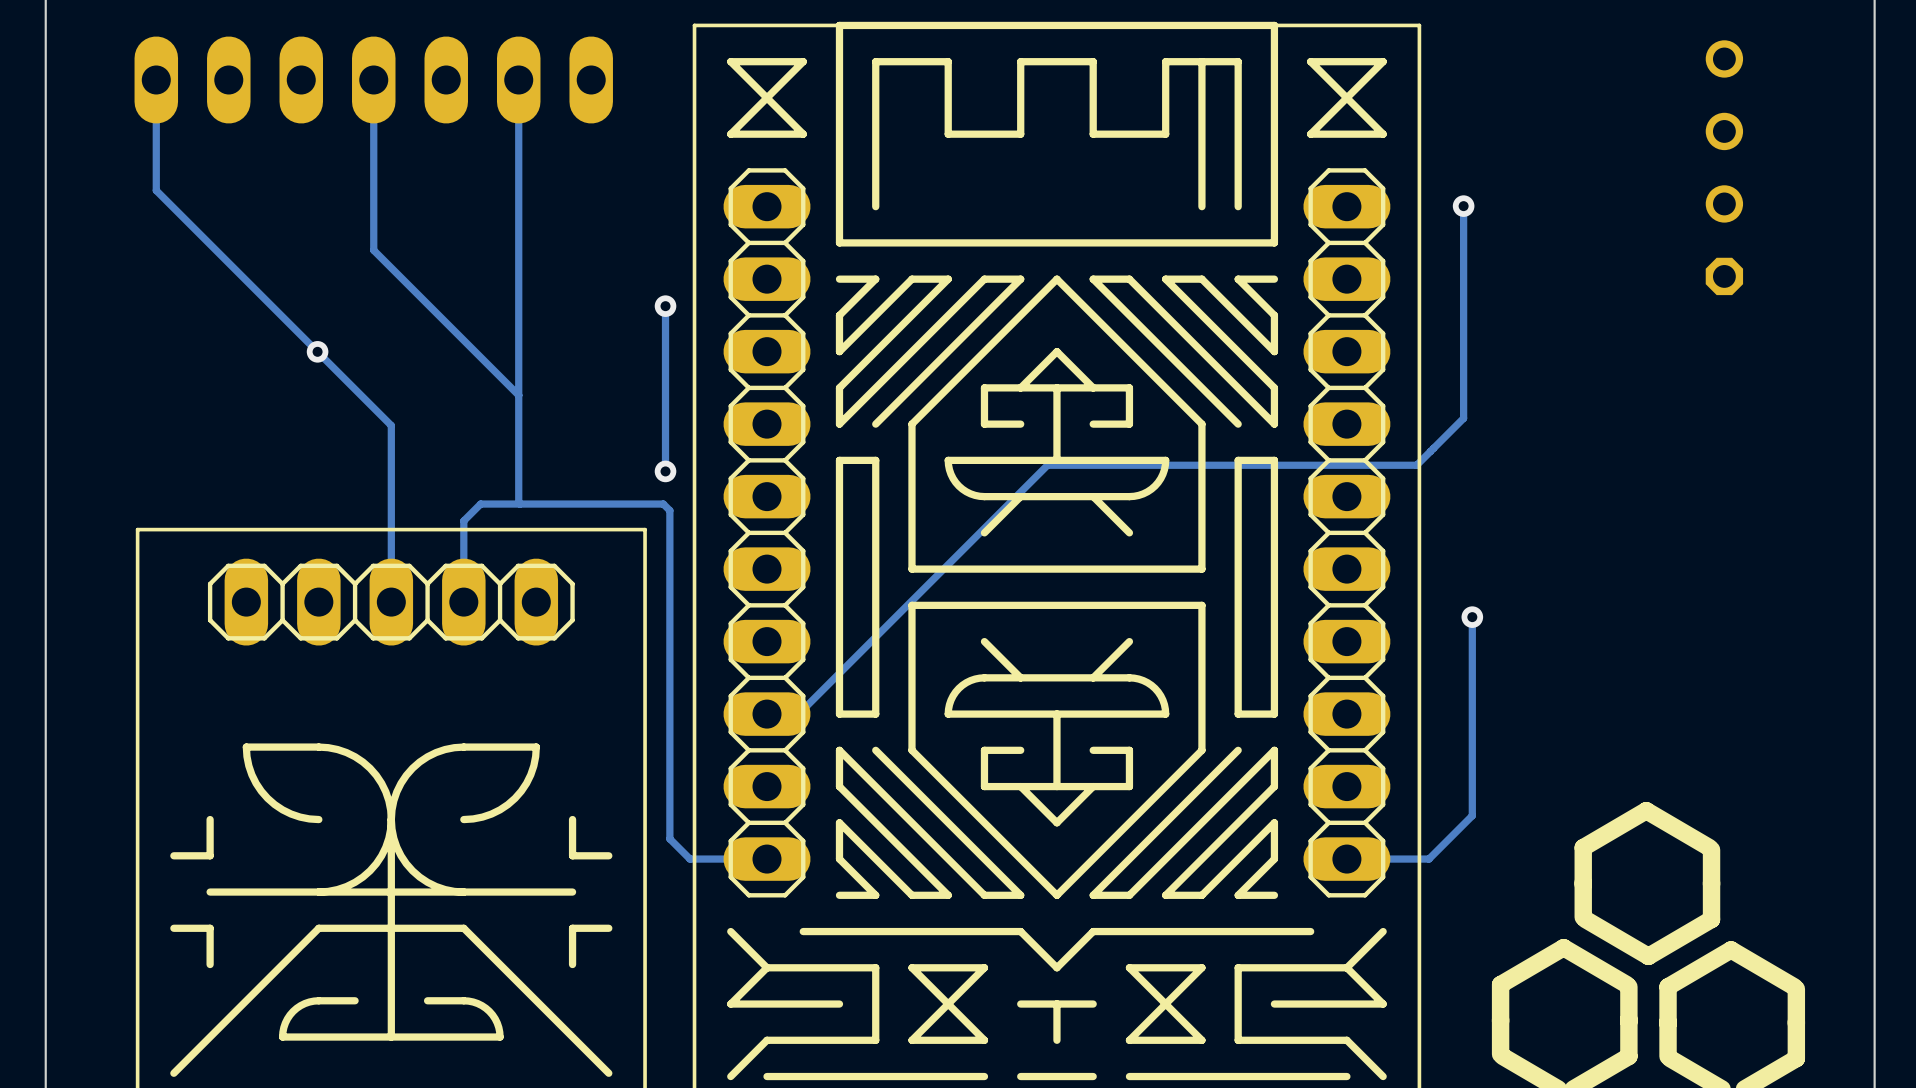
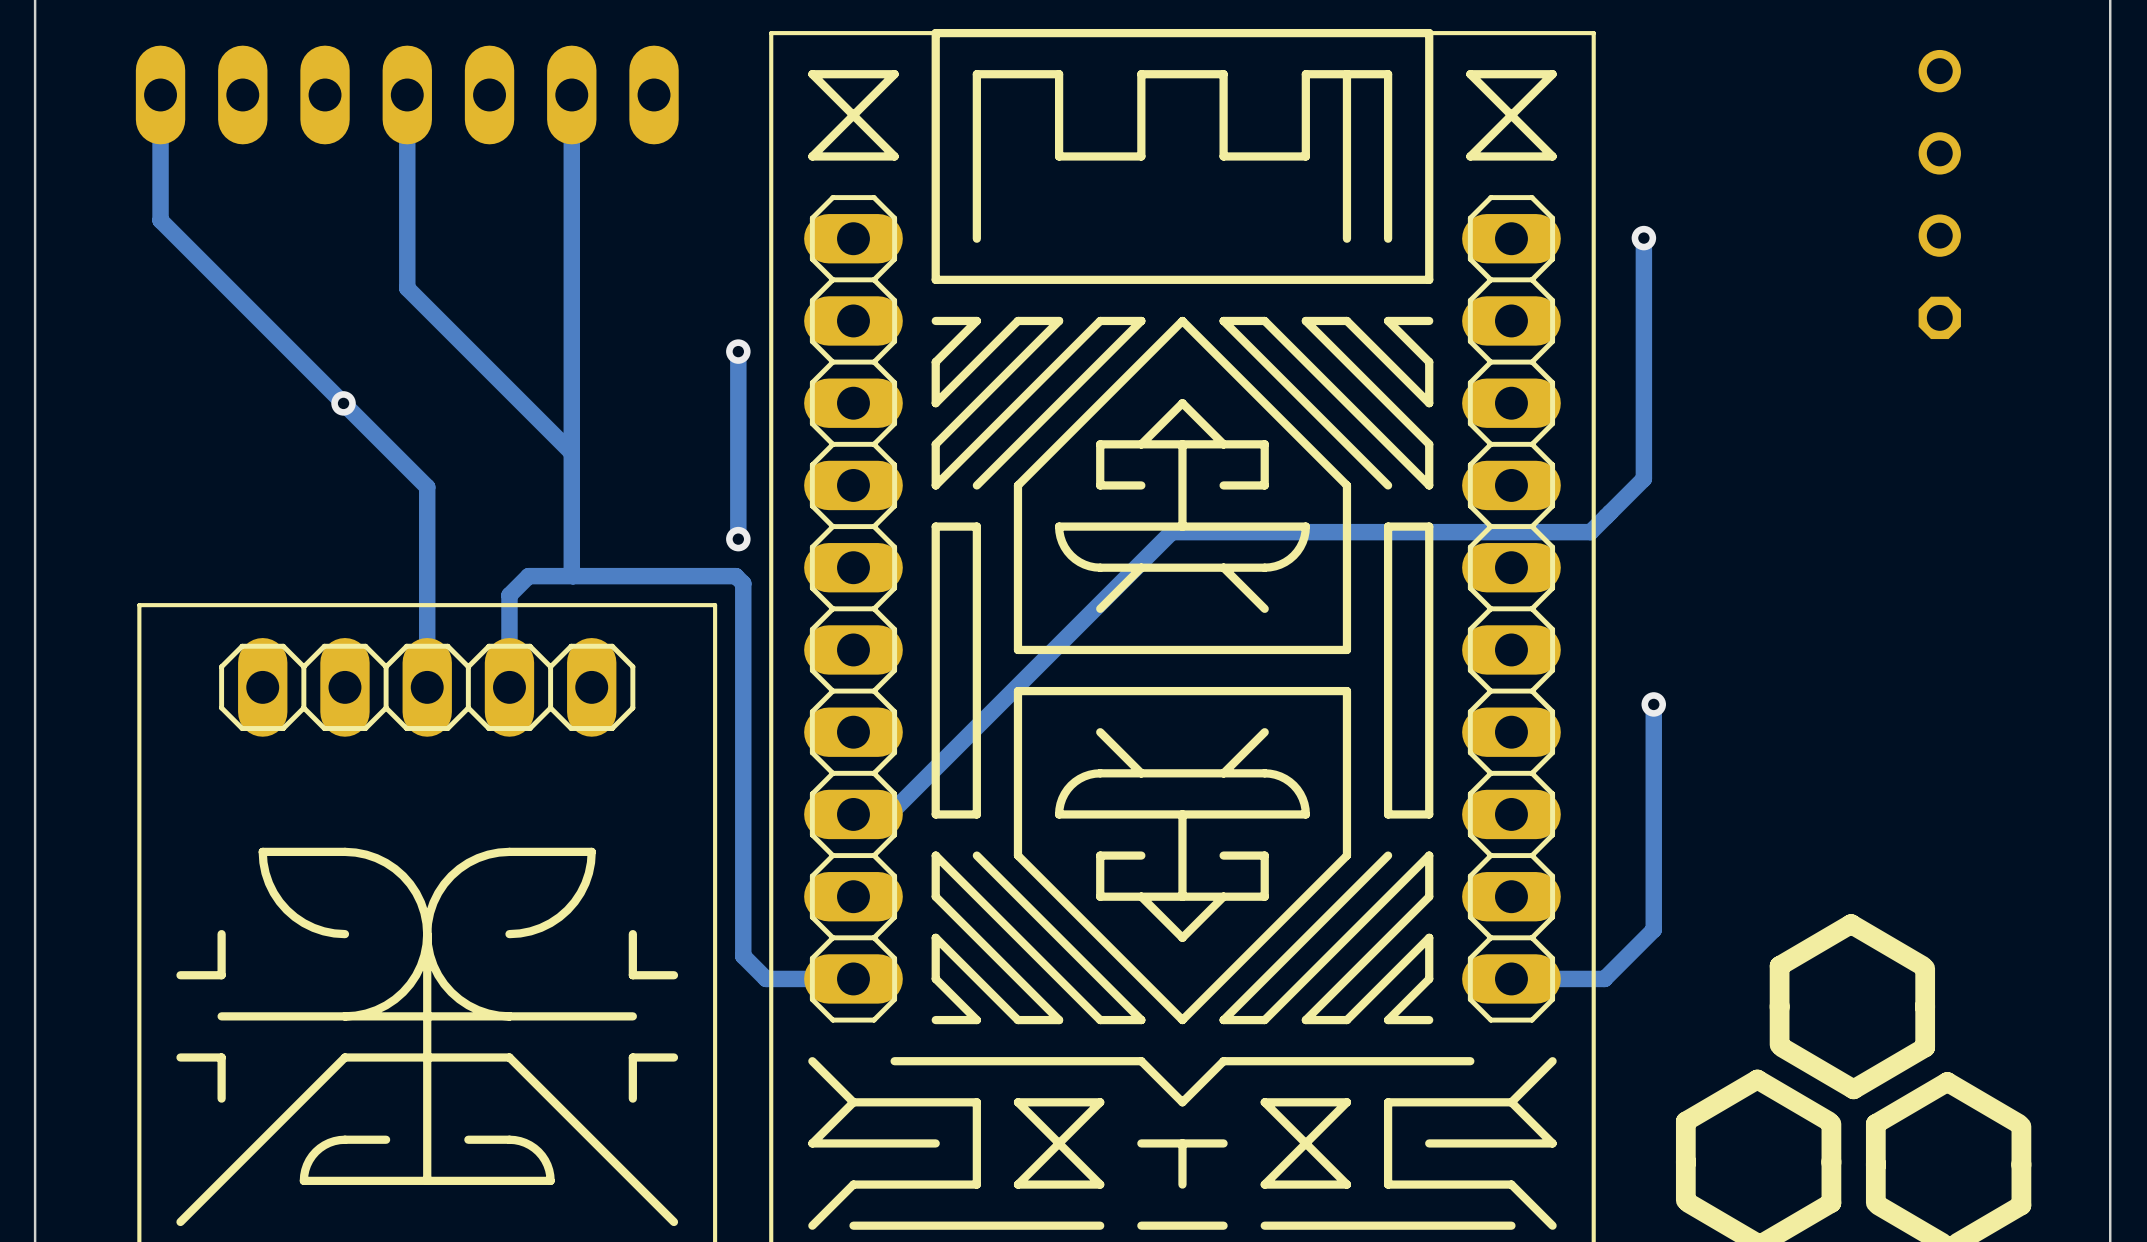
track width: thin (156, 79) (156, 190) (391, 425) (391, 602) -> thick (160, 94) (160, 220) (427, 487) (427, 687)
track width: thin (373, 79) (373, 250) (518, 395) -> thick (407, 94) (407, 288) (571, 452)
track width: thin (518, 79) (519, 504) -> thick (571, 94) (573, 576)
track width: thin (1463, 206) (1463, 418) (1416, 465) (1047, 465) (798, 714) (767, 714) -> thick (1643, 238) (1643, 478) (1590, 532) (1171, 532) (889, 814) (853, 814)
track width: thin (665, 306) (665, 471) -> thick (738, 351) (738, 539)
track width: thin (463, 602) (463, 520) (480, 504) (663, 504) (669, 510) (669, 838) (689, 859) (761, 859) -> thick (509, 687) (509, 595) (528, 576) (735, 576) (743, 583) (743, 956) (766, 978) (847, 978)
track width: thin (1472, 617) (1472, 815) (1429, 859) (1346, 859) -> thick (1653, 704) (1653, 929) (1604, 978) (1511, 978)

